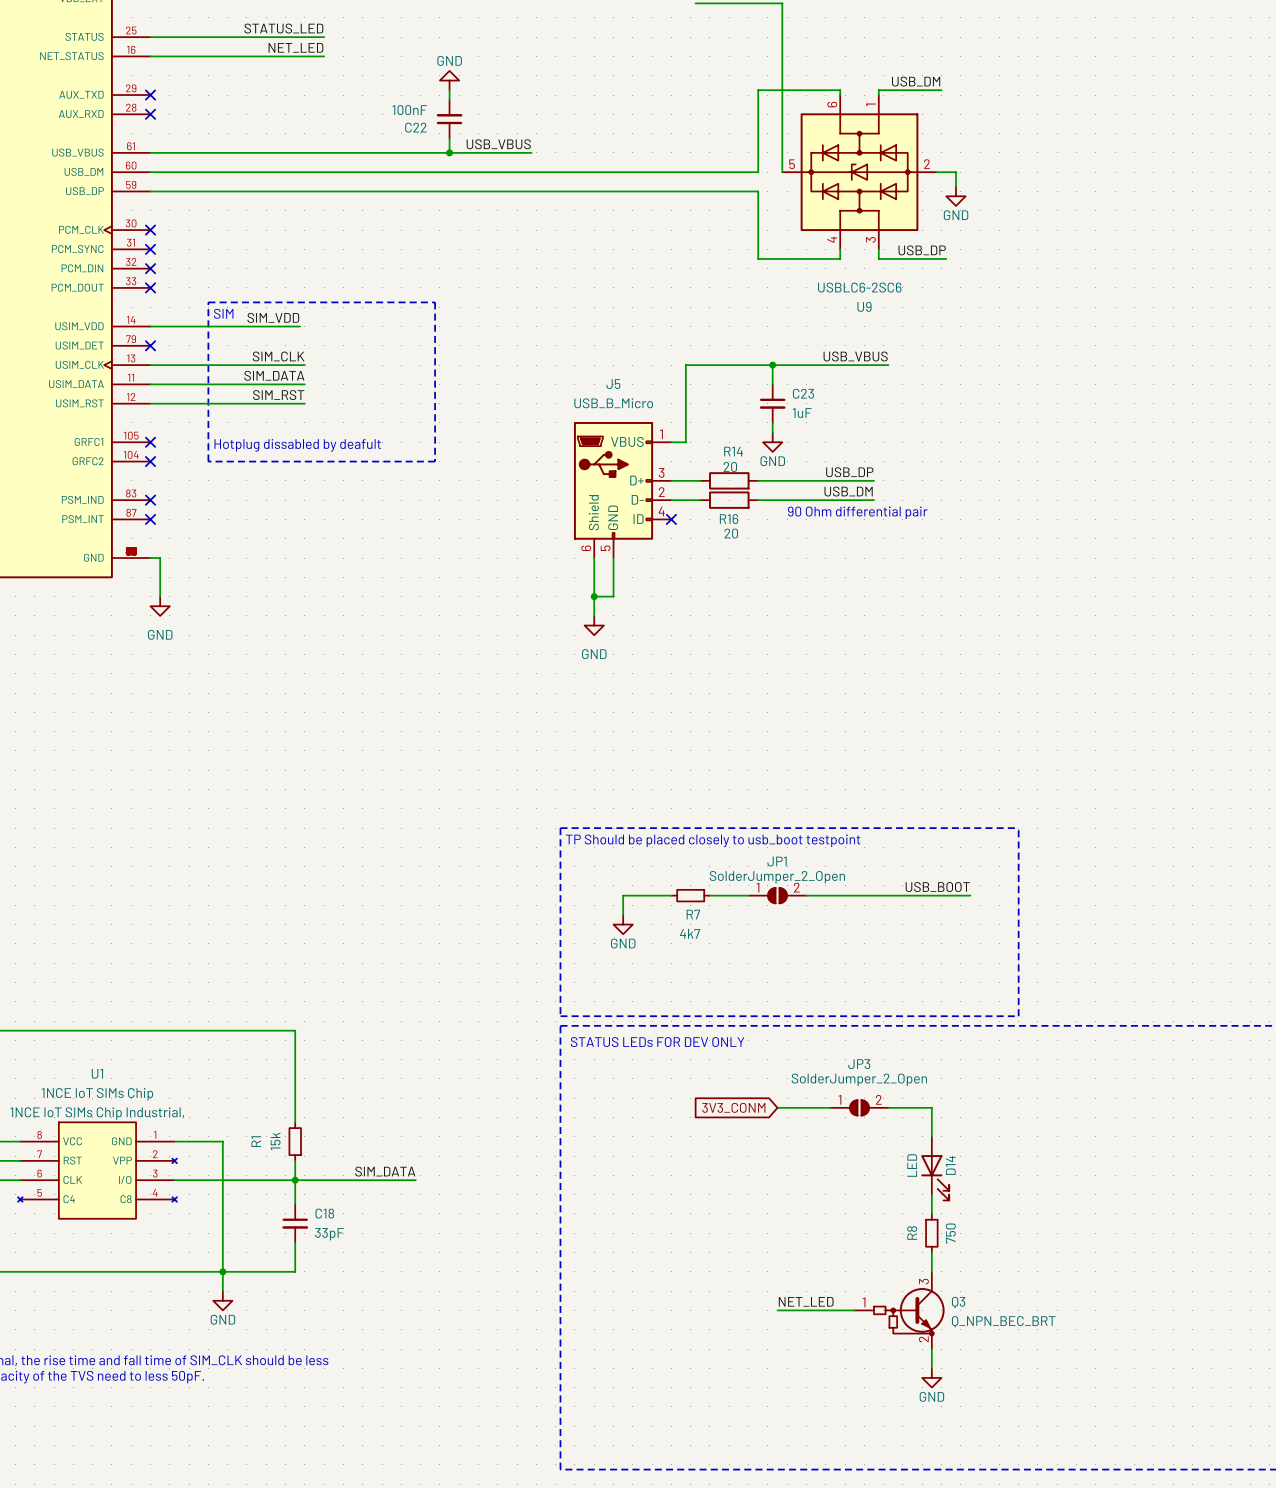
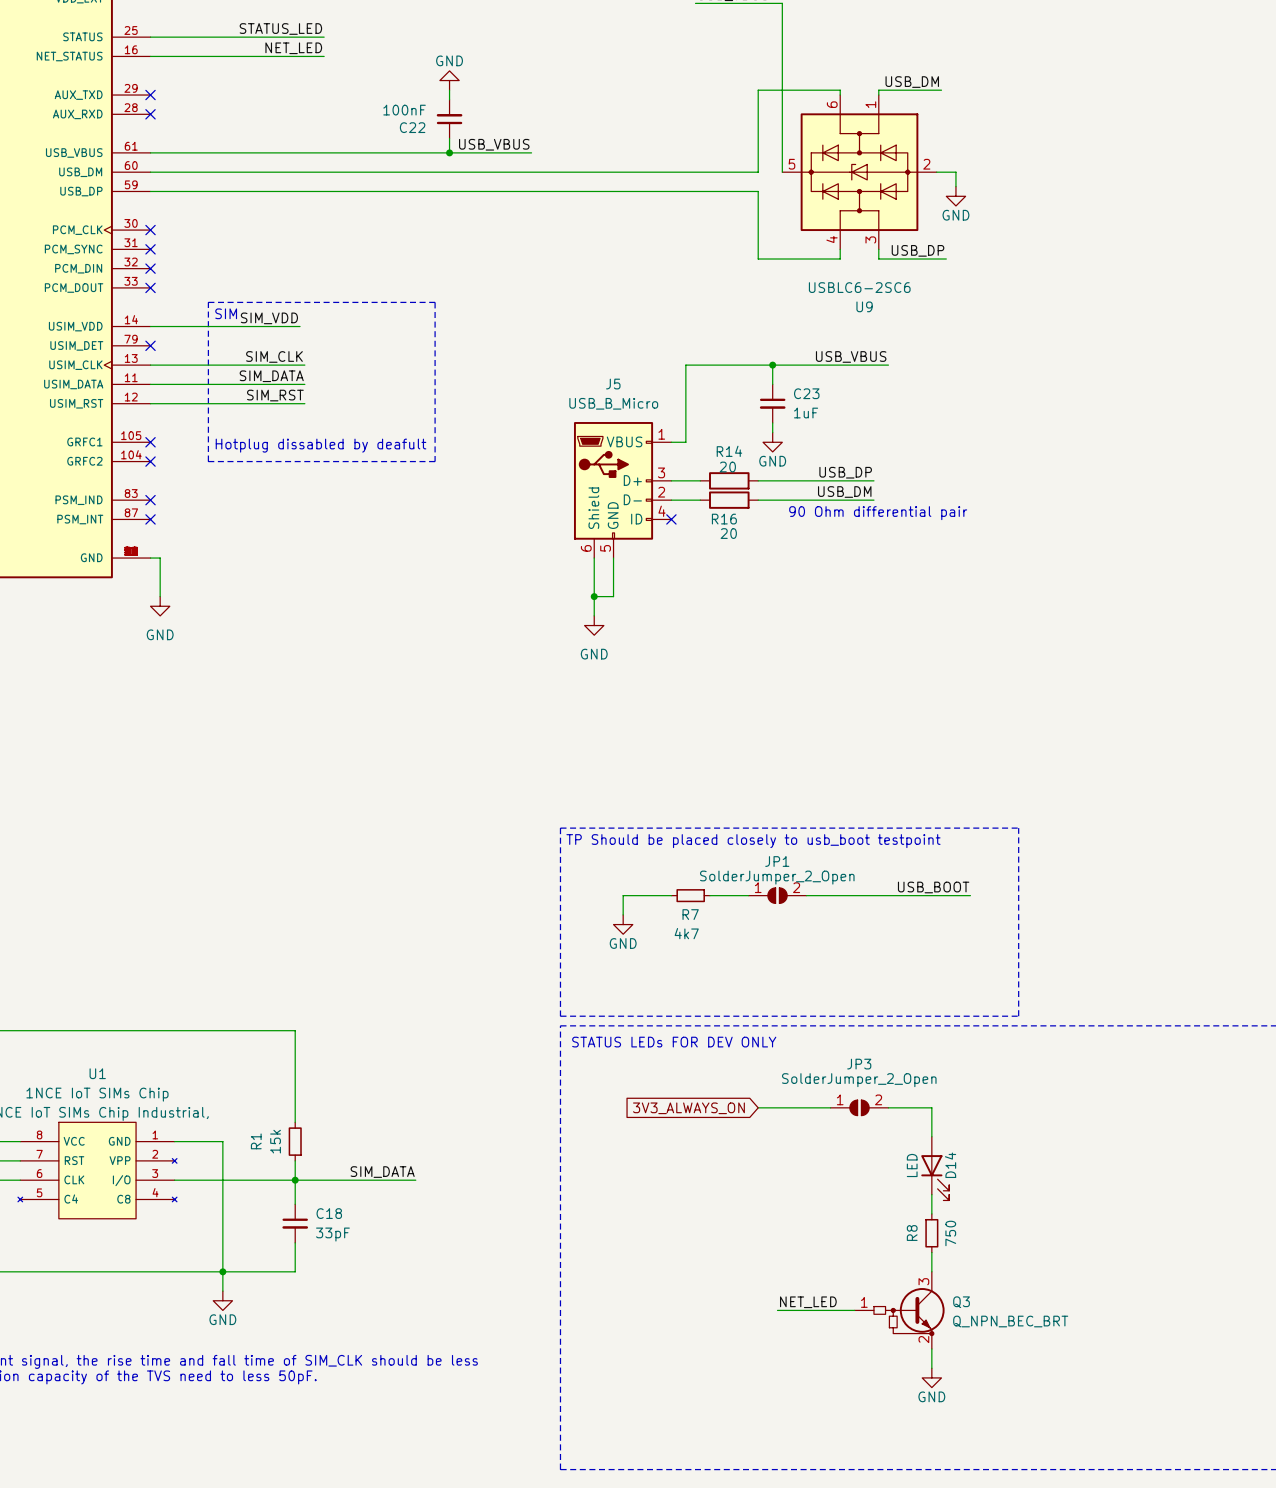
global label: none -> 3V3_ALWAYS_ON (688, 1108)
global label: 3V3_CONM (733, 1107) -> none
wire: none -> (758, 1107) (777, 1107)

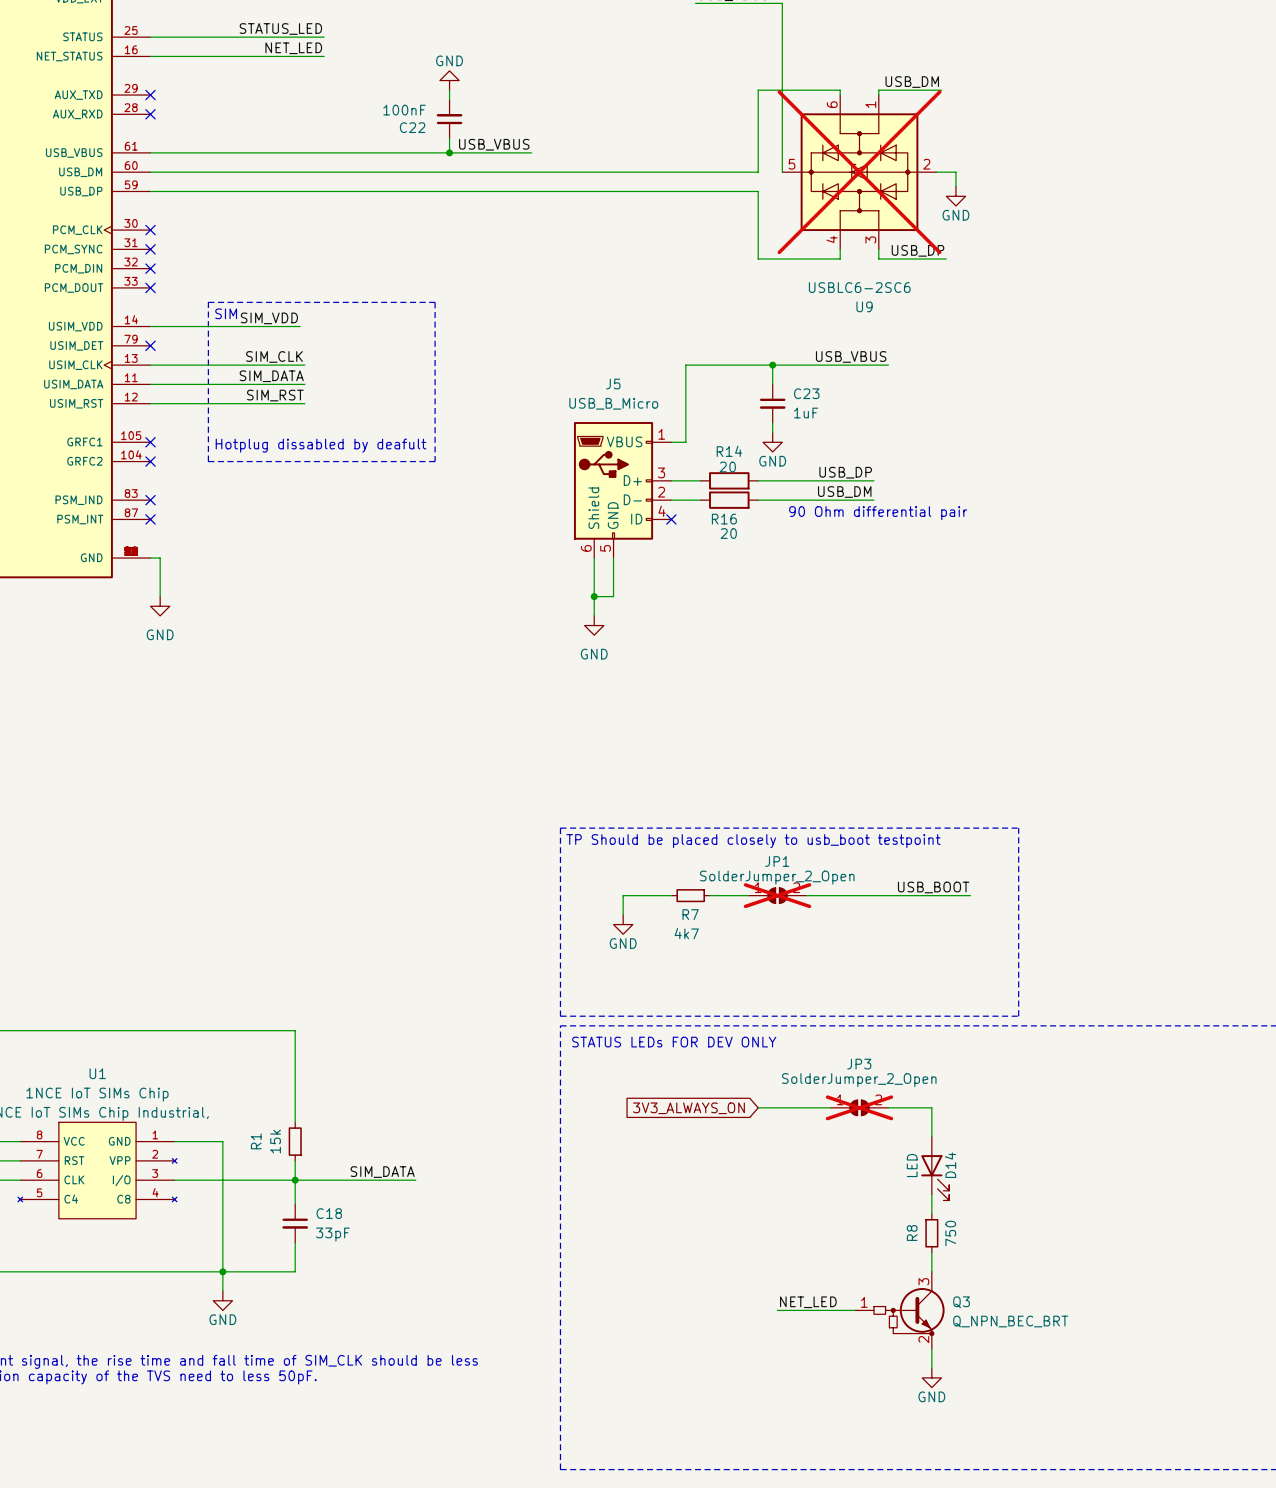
U9 do-not-place cross: none -> (859, 172)
JP1 do-not-place cross: none -> (777, 895)
JP3 do-not-place cross: none -> (859, 1107)

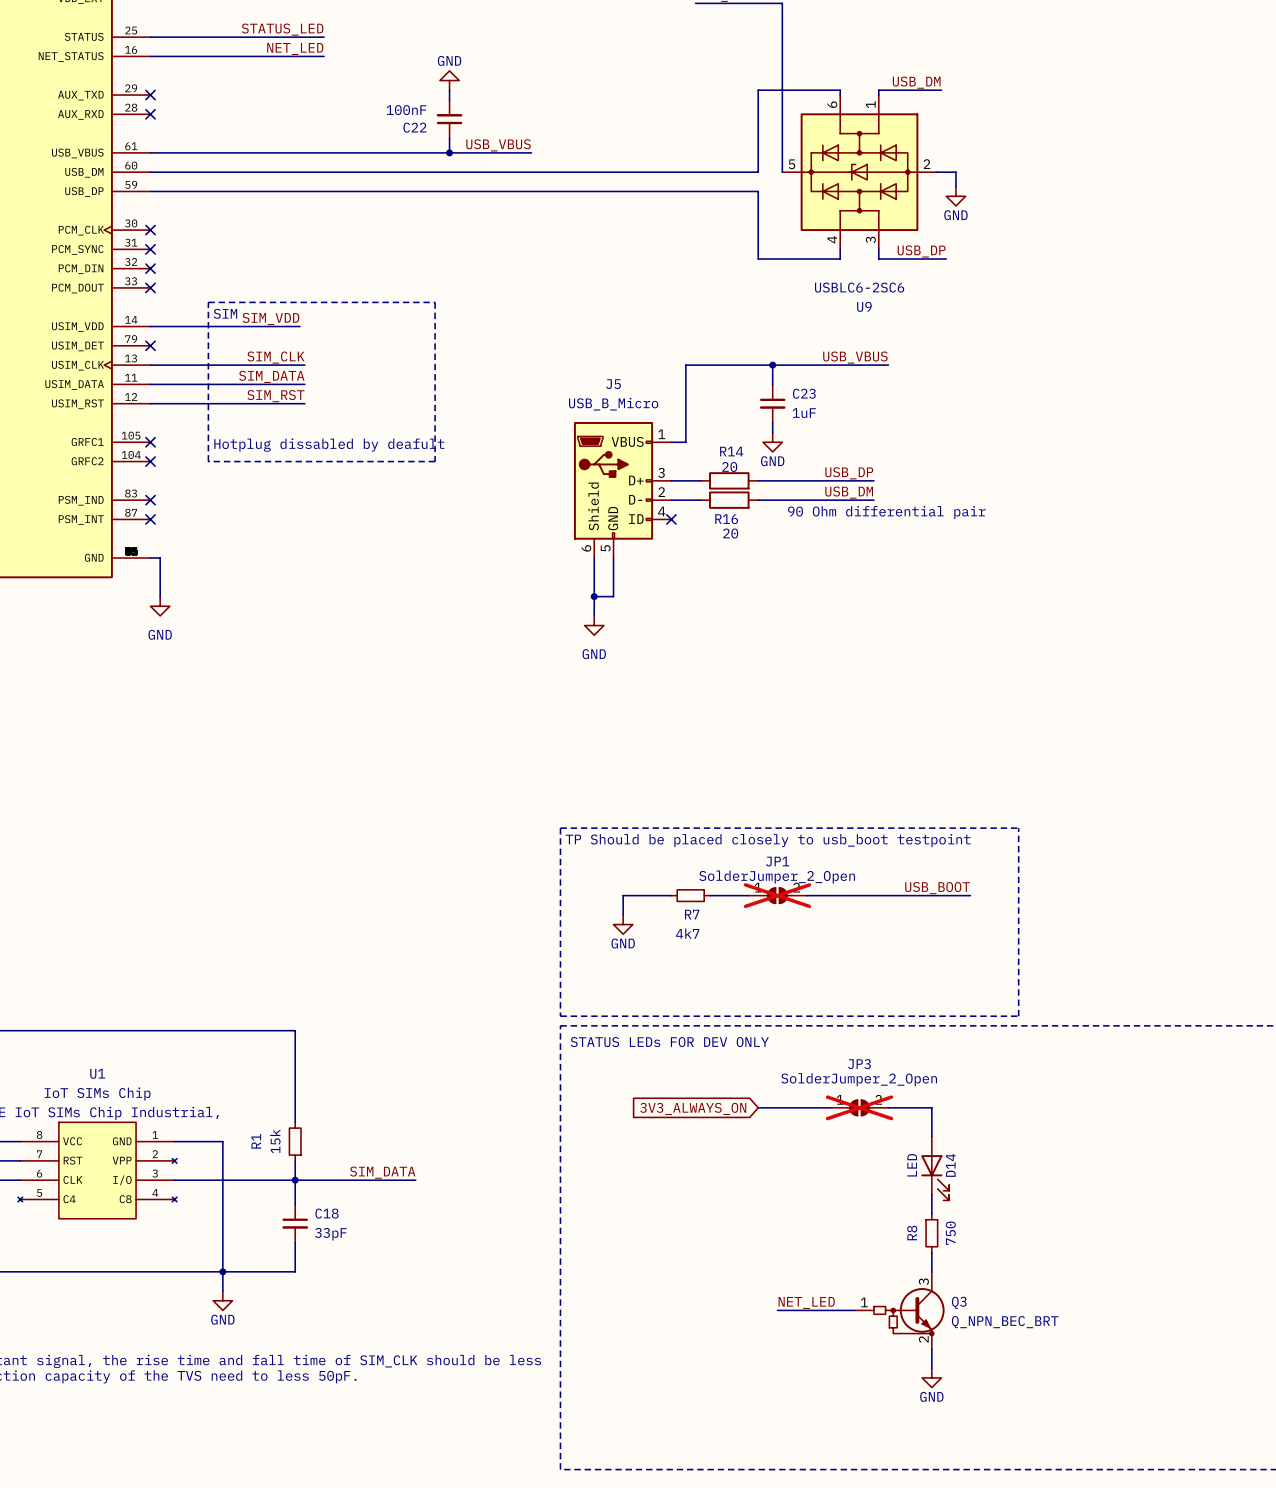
U9 do-not-place cross: (859, 172) -> none
U1 value: 1NCE IoT SIMs Chip (97, 1094) -> IoT SIMs Chip (97, 1094)

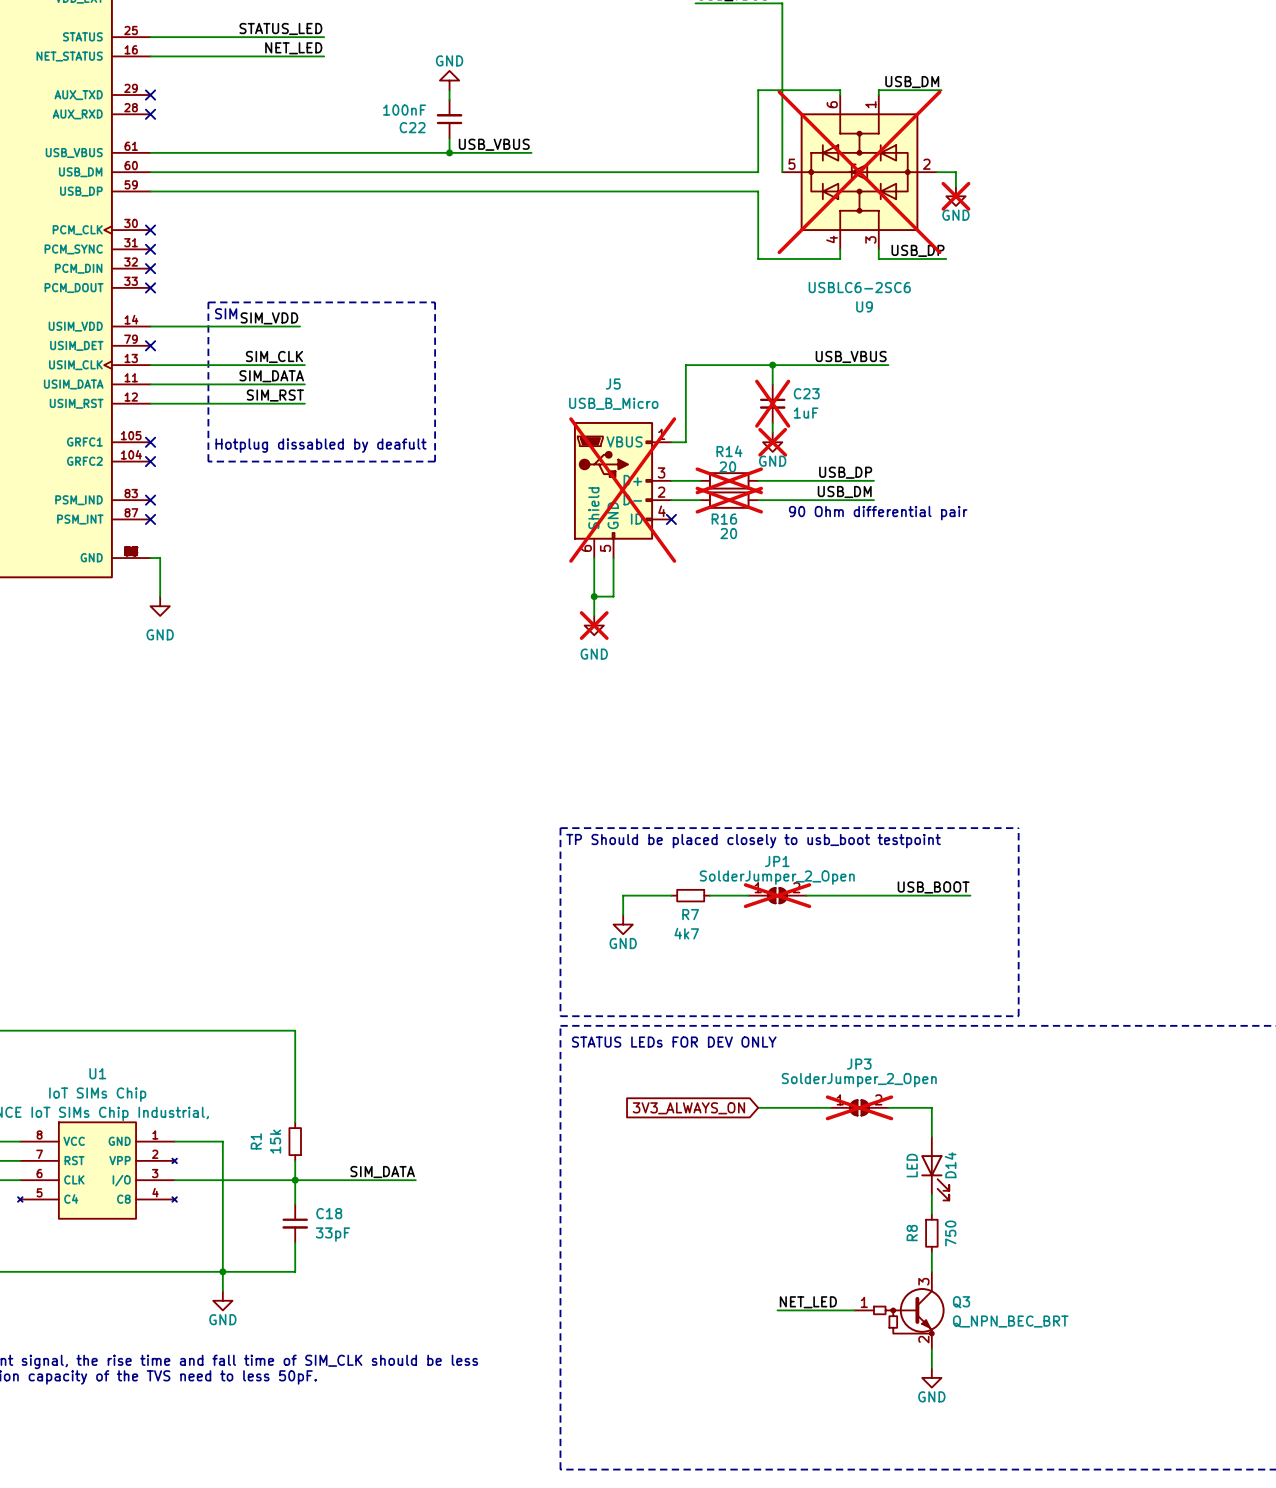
U9 do-not-place cross: none -> (859, 172)
power symbol do-not-place cross: none -> (955, 196)
C23 do-not-place cross: none -> (772, 403)
power symbol do-not-place cross: none -> (772, 442)
R14 do-not-place cross: none -> (729, 480)
J5 do-not-place cross: none -> (622, 490)
R16 do-not-place cross: none -> (729, 500)
power symbol do-not-place cross: none -> (594, 625)

